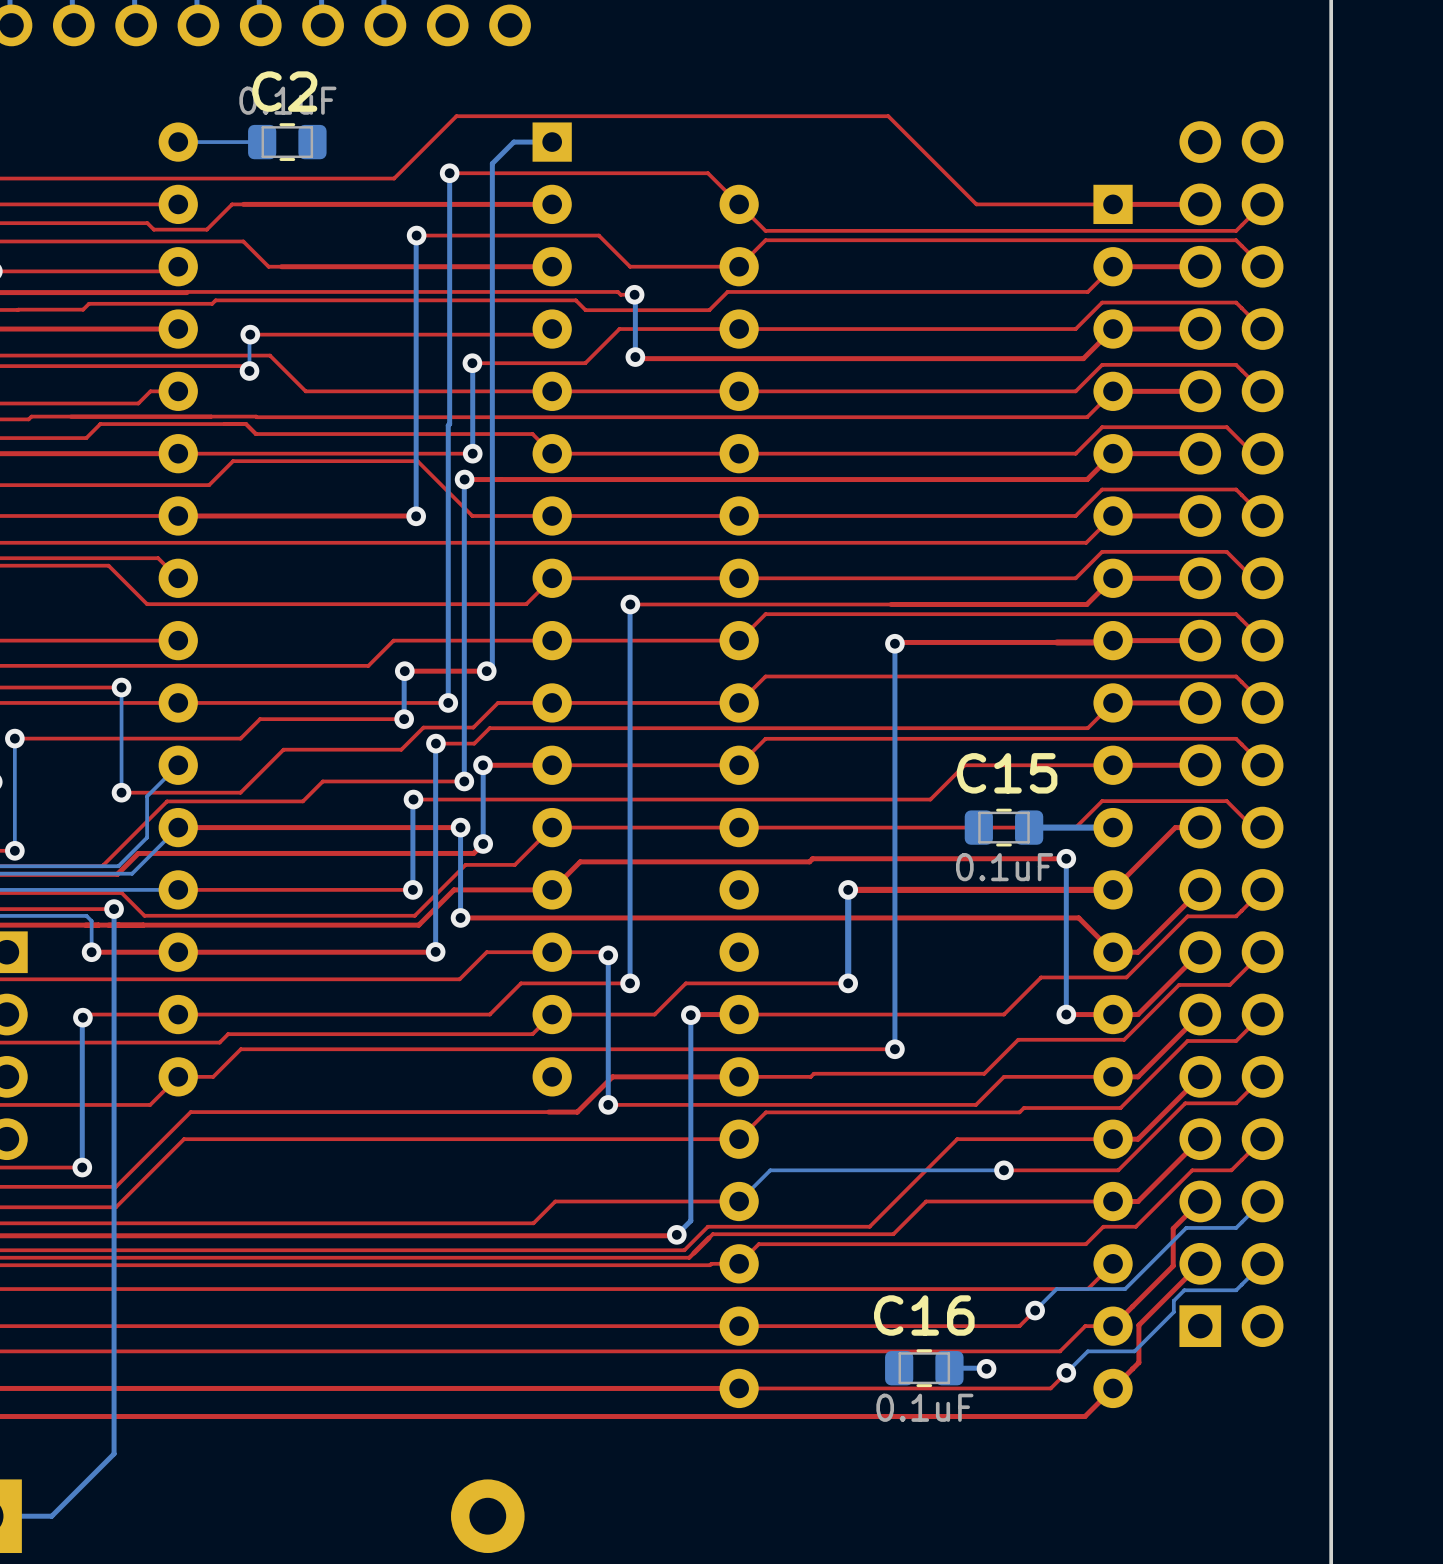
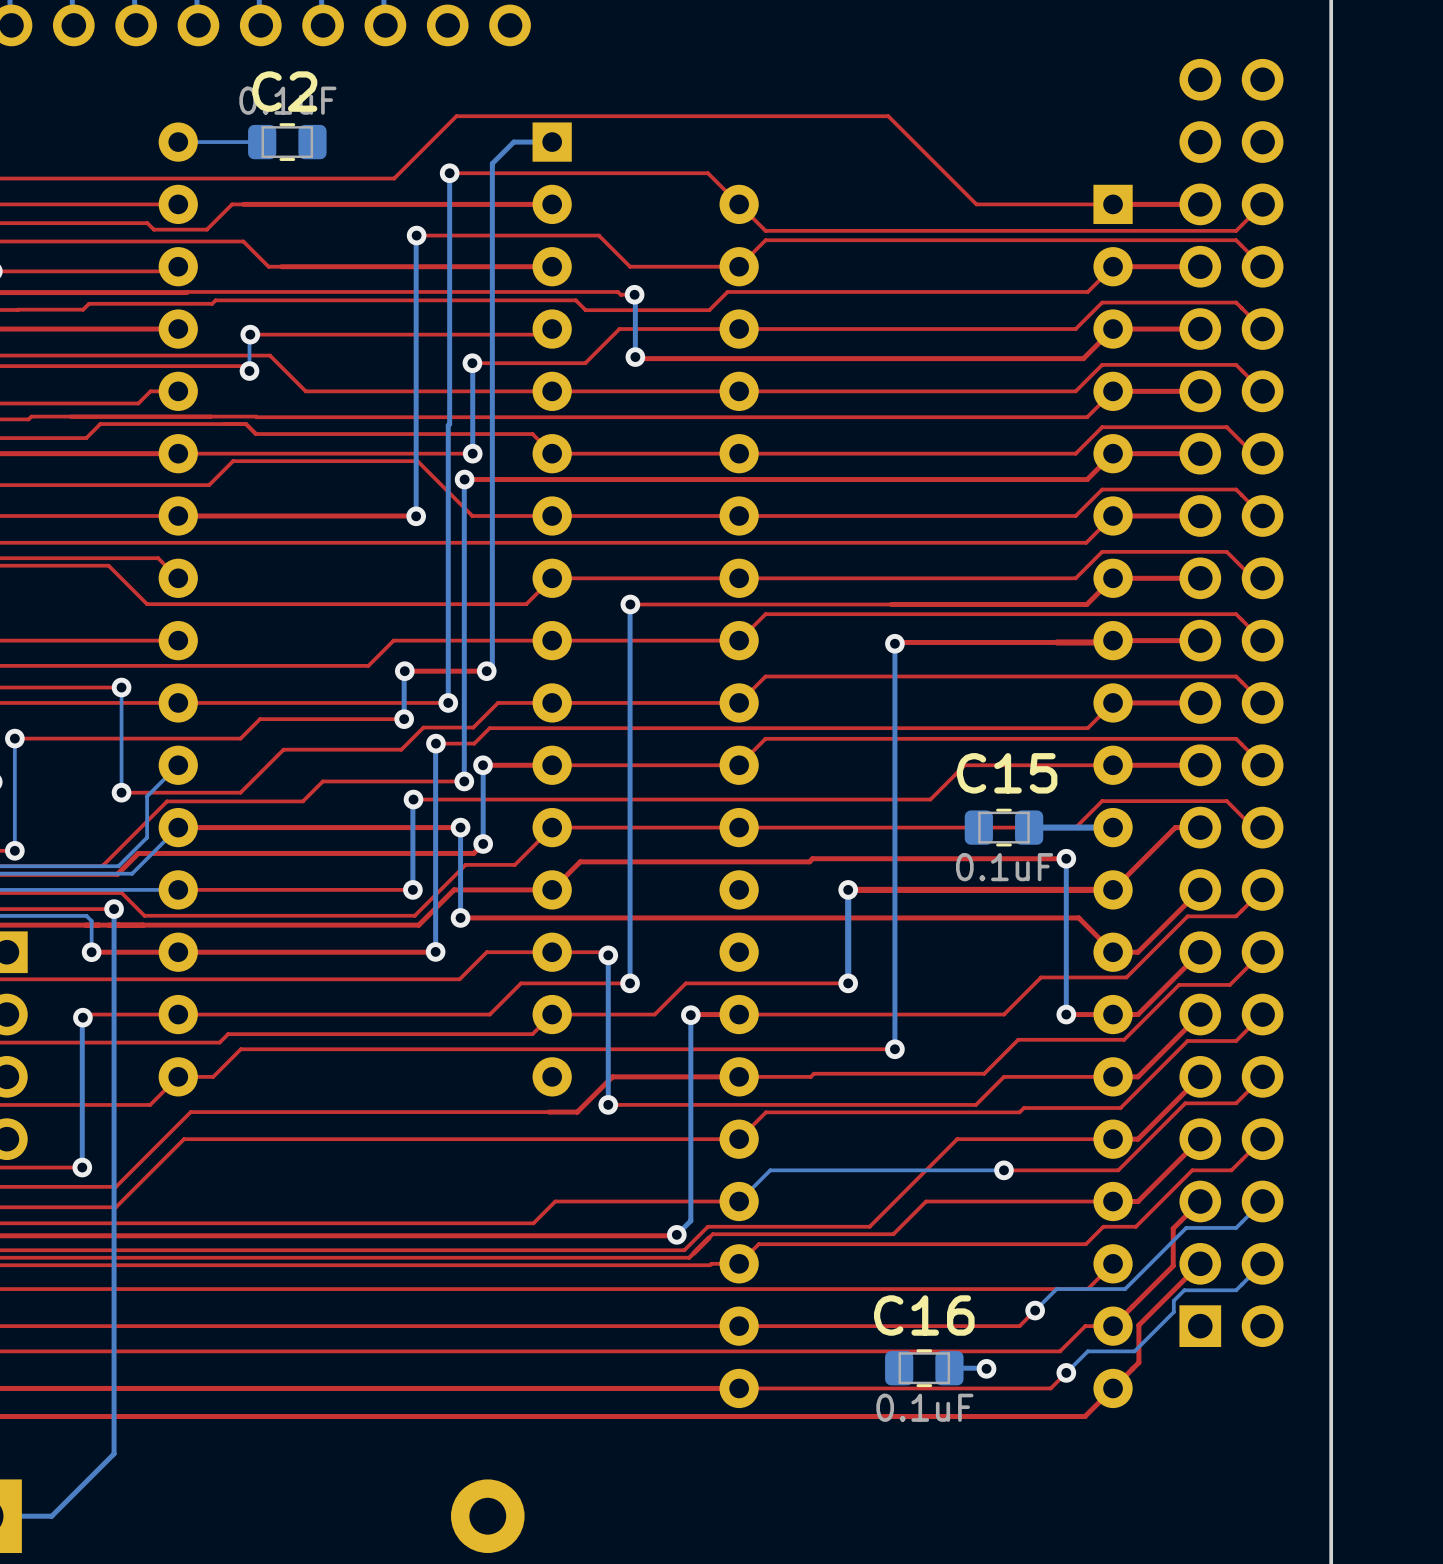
part: none -> (1231, 702)

